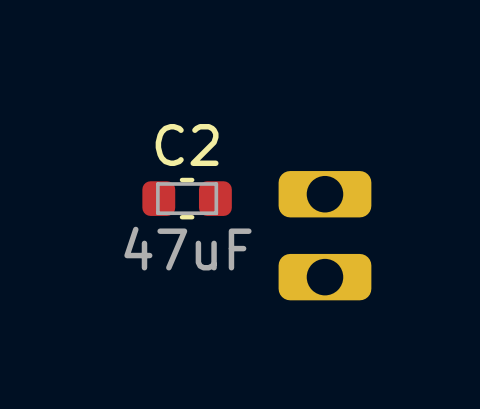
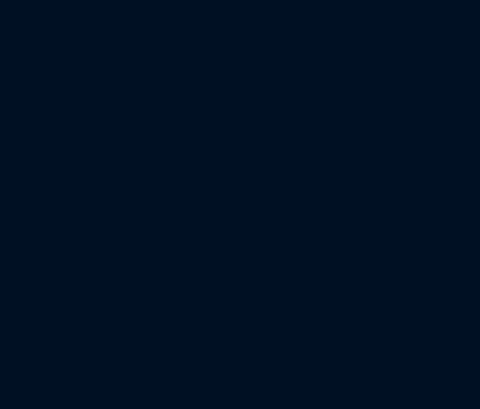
part: (324, 194) -> none
C2: 47uF (187, 198) -> none
part: (324, 277) -> none

